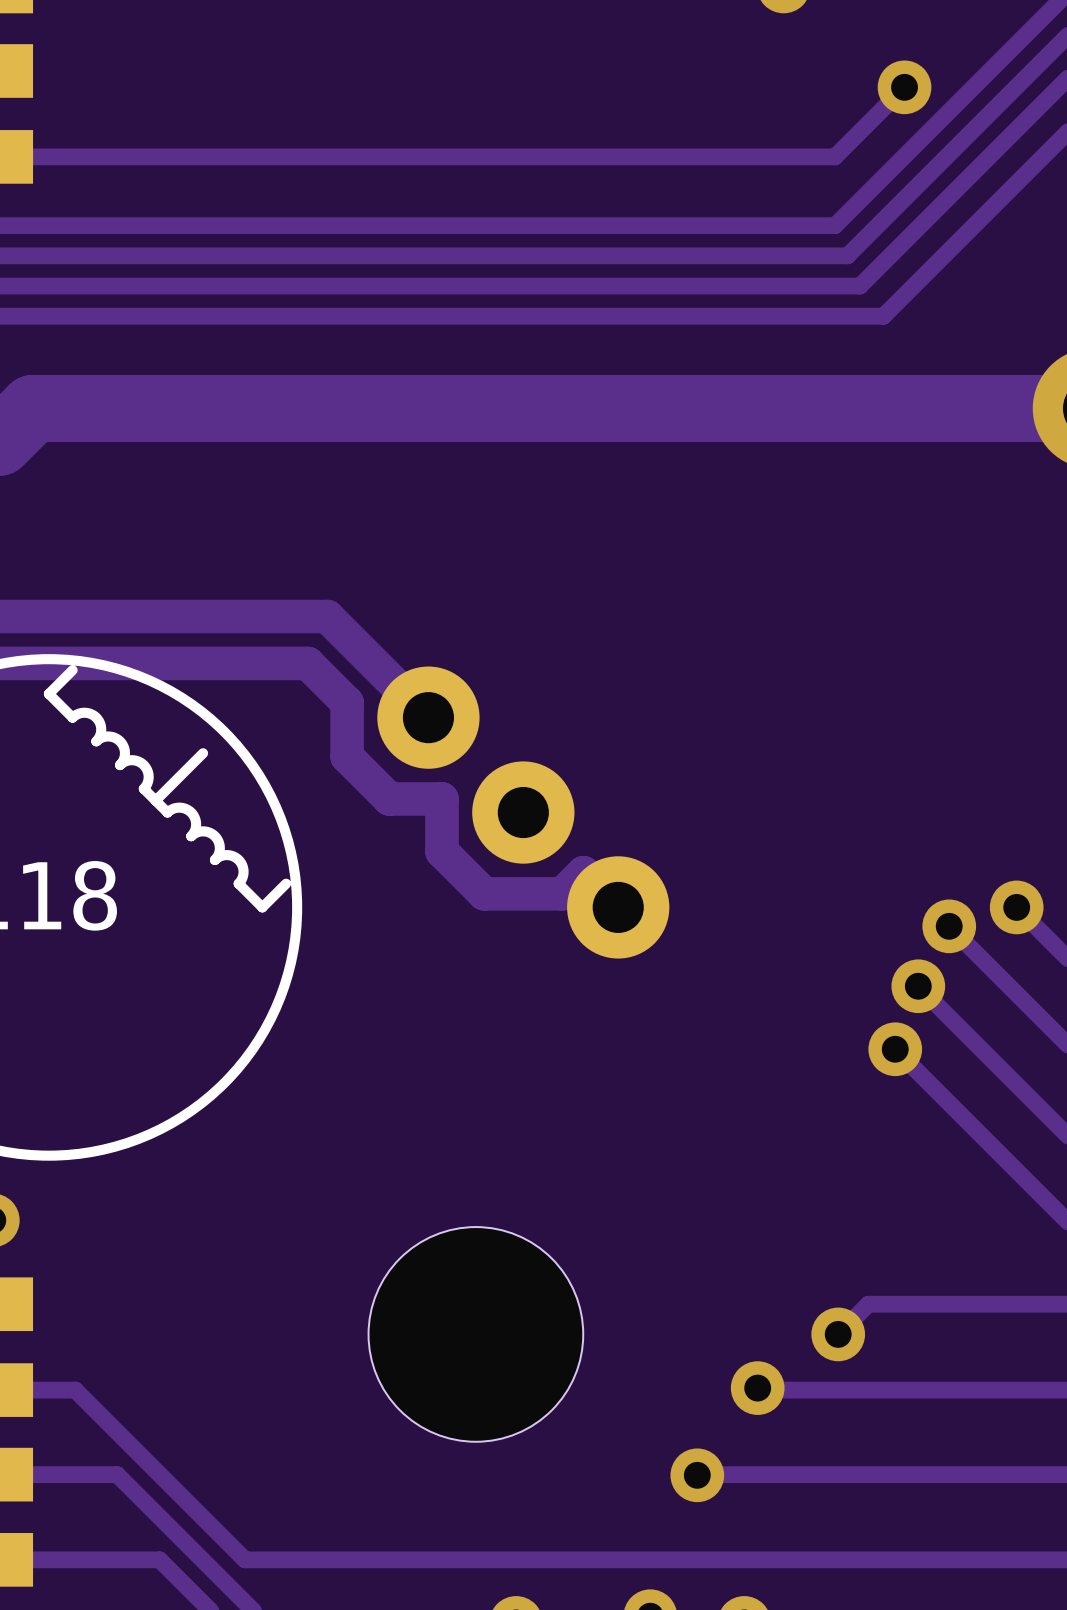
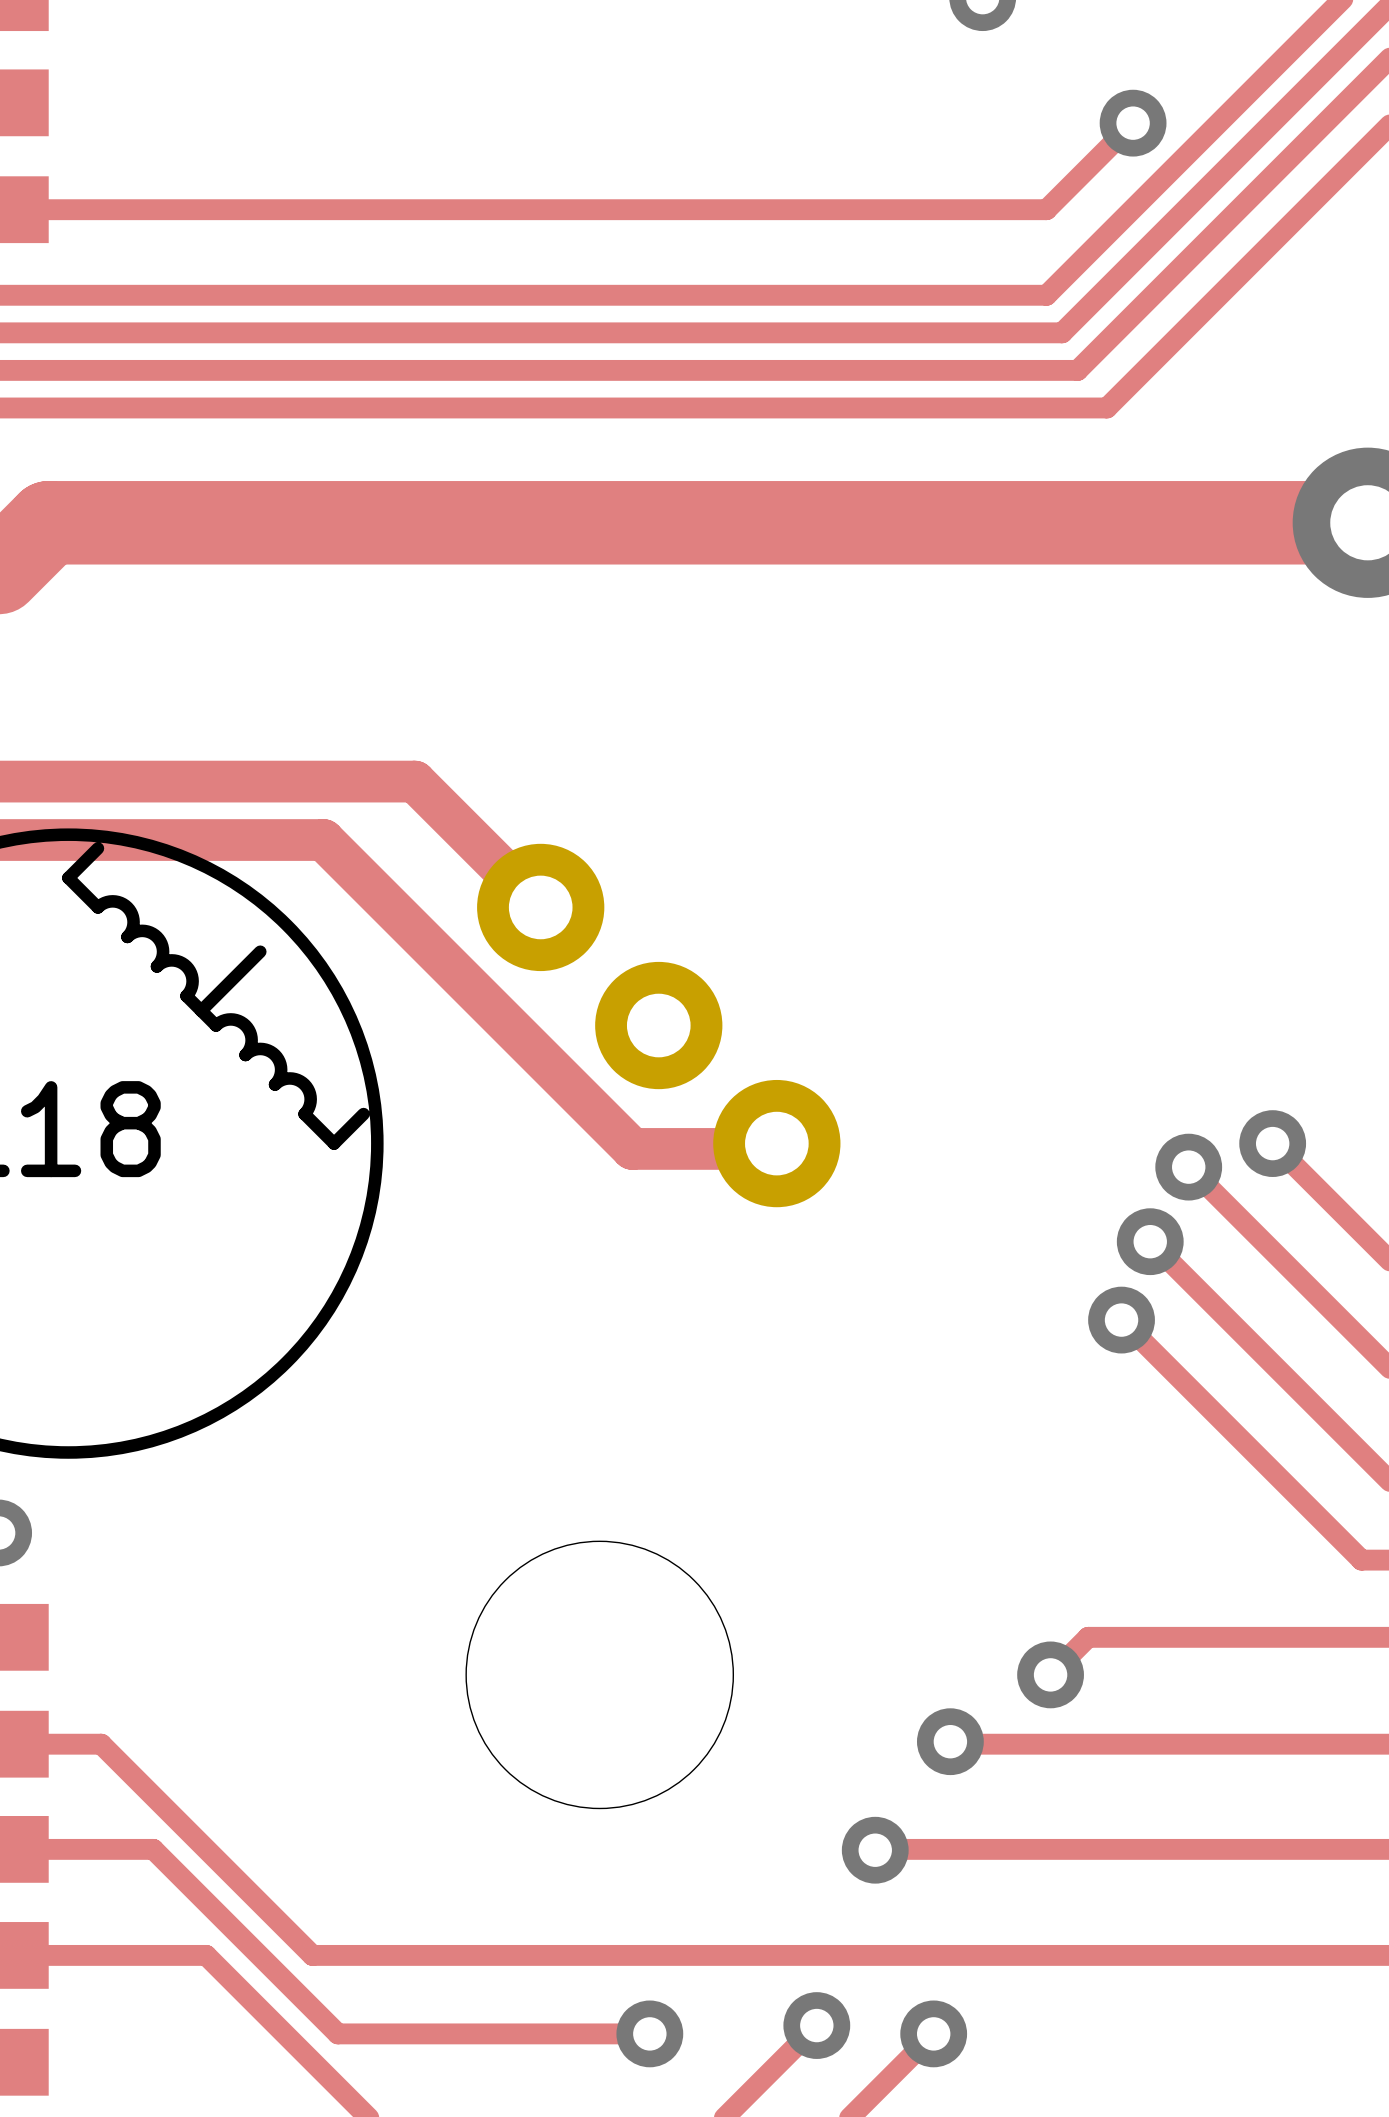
track: (253, 663) (307, 663) (347, 702) (347, 756) -> (323, 840) (439, 956)
track: (389, 798) (442, 798) (442, 851) -> (492, 1008) (557, 1074)
track: (484, 893) (562, 893) (583, 872) (618, 907) -> (610, 1126) (632, 1148) (771, 1148) (776, 1143)

